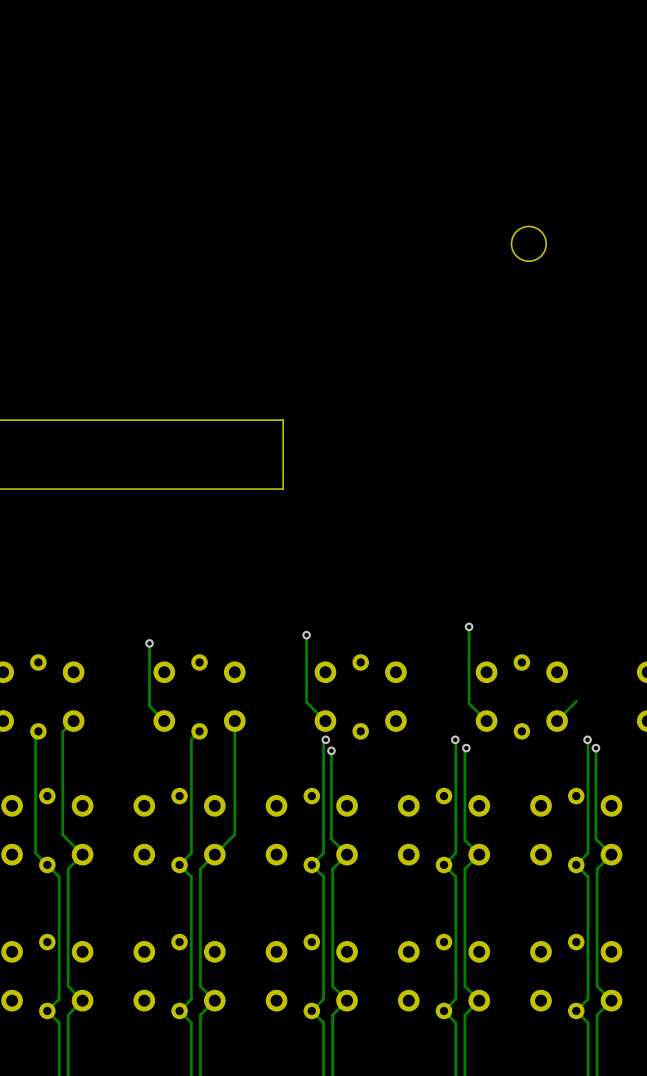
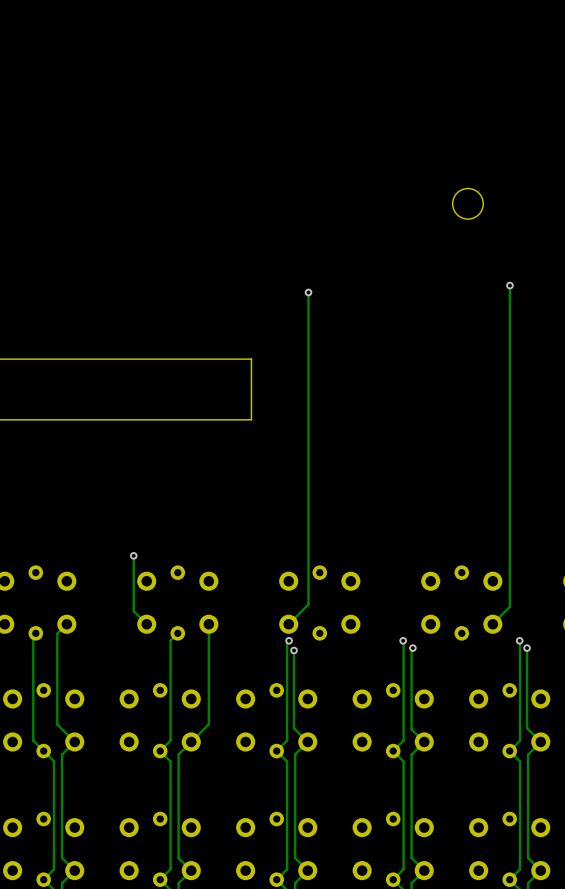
track: none -> (509, 285) (509, 606)
via: none -> (509, 285)
via: none -> (308, 292)
track: (469, 626) (469, 703) (486, 721) -> none
via: (469, 626) -> none
track: (306, 635) (306, 702) (325, 721) -> (308, 292) (308, 604) (288, 624)
via: (306, 635) -> none

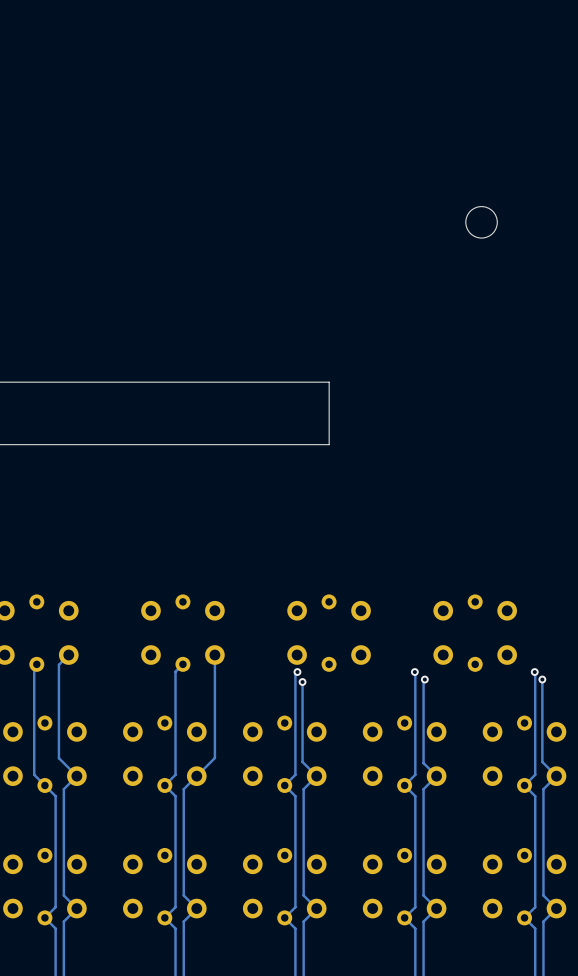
track: (509, 285) (509, 606) (492, 624) -> none
via: (509, 285) -> none
track: (308, 292) (308, 604) (288, 624) -> none
via: (308, 292) -> none
board edge: (251, 359) (251, 419) -> (258, 382) (329, 382) (329, 444) (258, 444)
track: (133, 555) (133, 611) (146, 624) -> none
via: (133, 555) -> none

